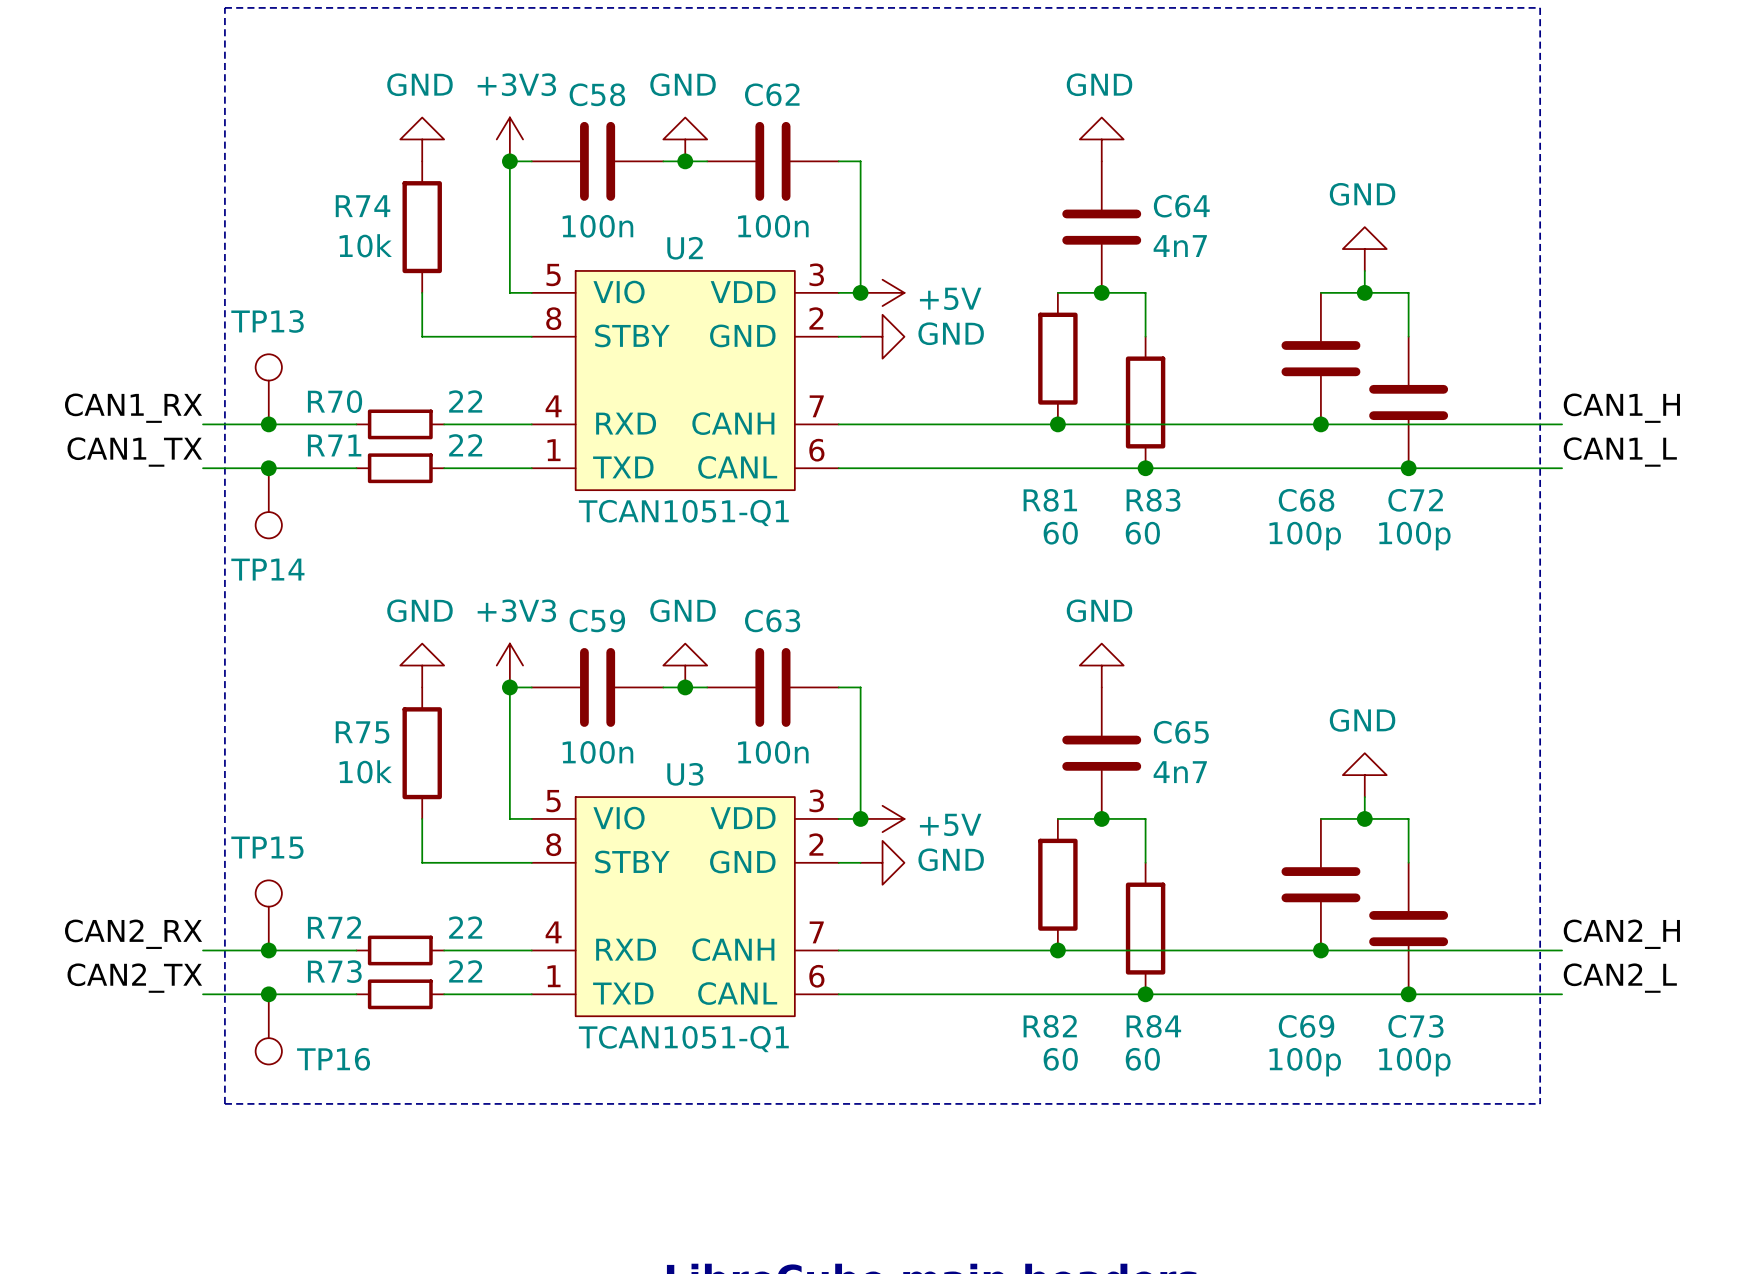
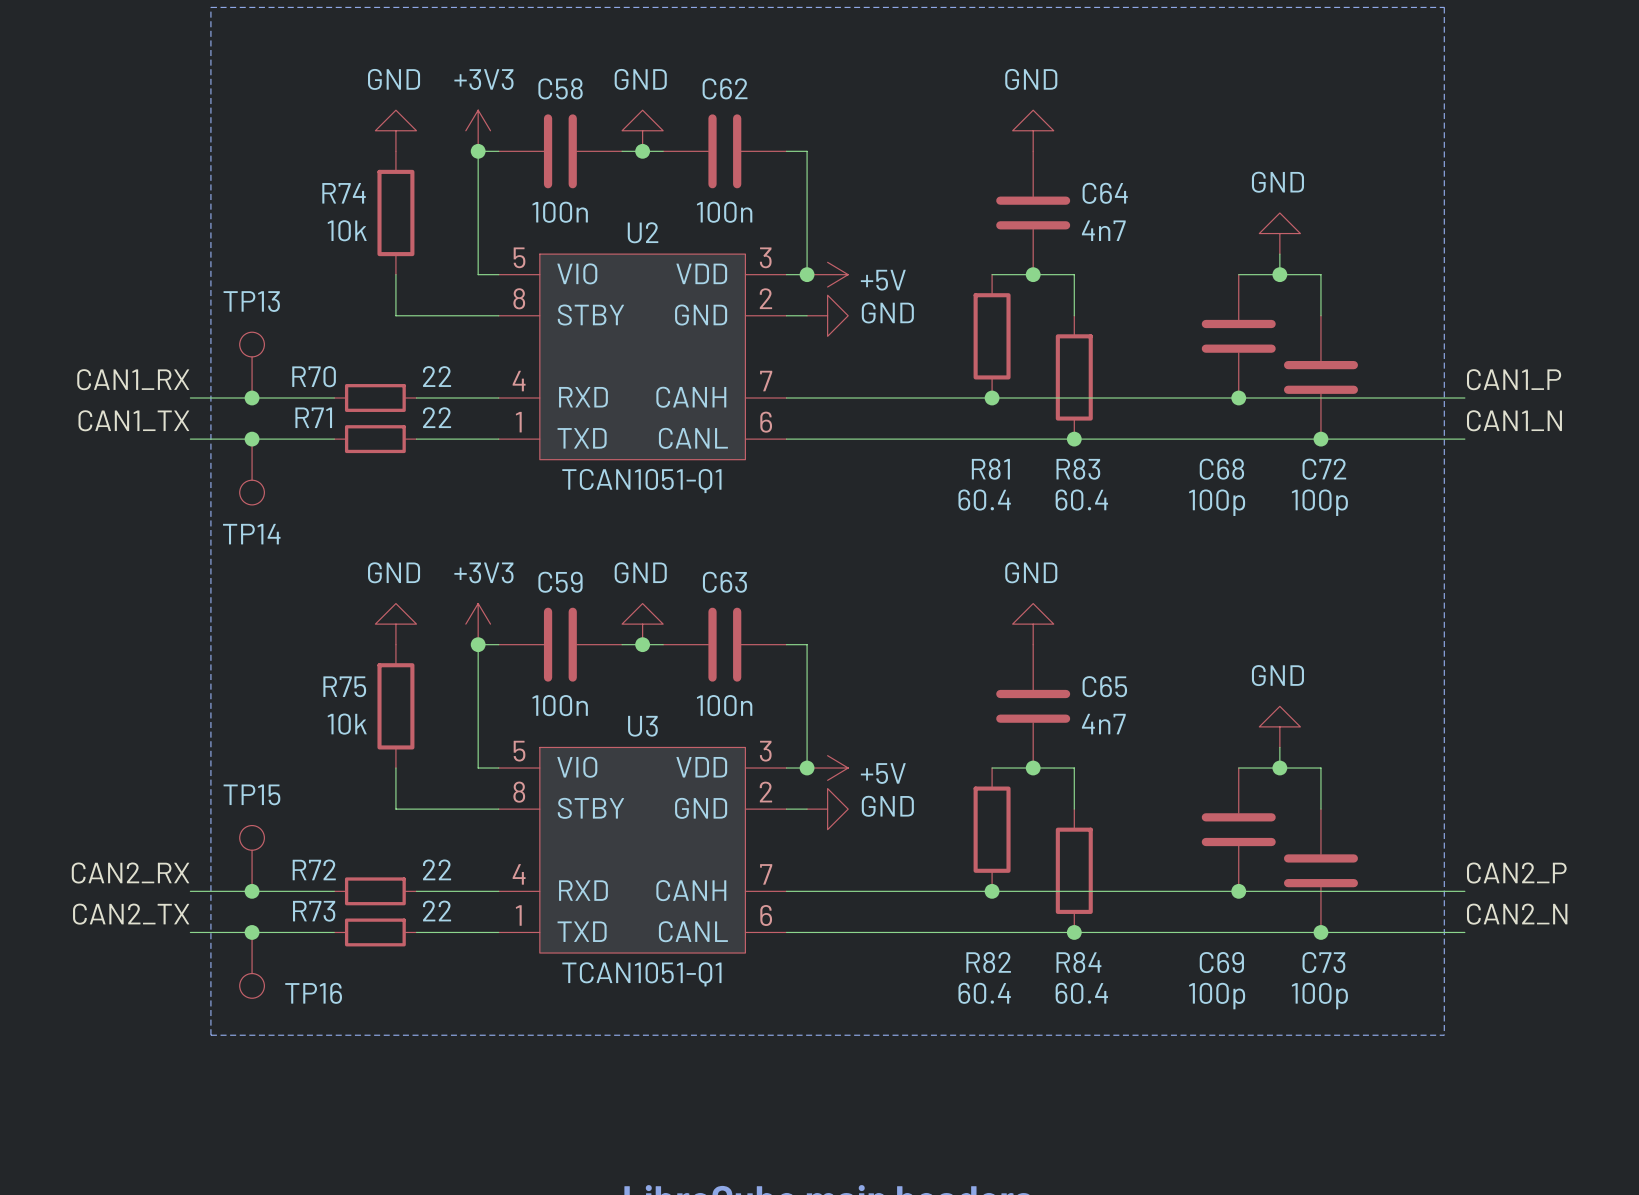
label: CAN1_H (1621, 408) -> CAN1_P (1514, 379)
label: CAN1_L (1620, 452) -> CAN1_N (1514, 420)
R81 value: 60 (1060, 533) -> 60.4 (984, 500)
R83 value: 60 (1142, 533) -> 60.4 (1081, 500)
label: CAN2_H (1621, 934) -> CAN2_P (1516, 873)
label: CAN2_L (1620, 978) -> CAN2_N (1517, 914)
R82 value: 60 (1060, 1059) -> 60.4 (984, 993)
R84 value: 60 (1142, 1059) -> 60.4 (1081, 993)

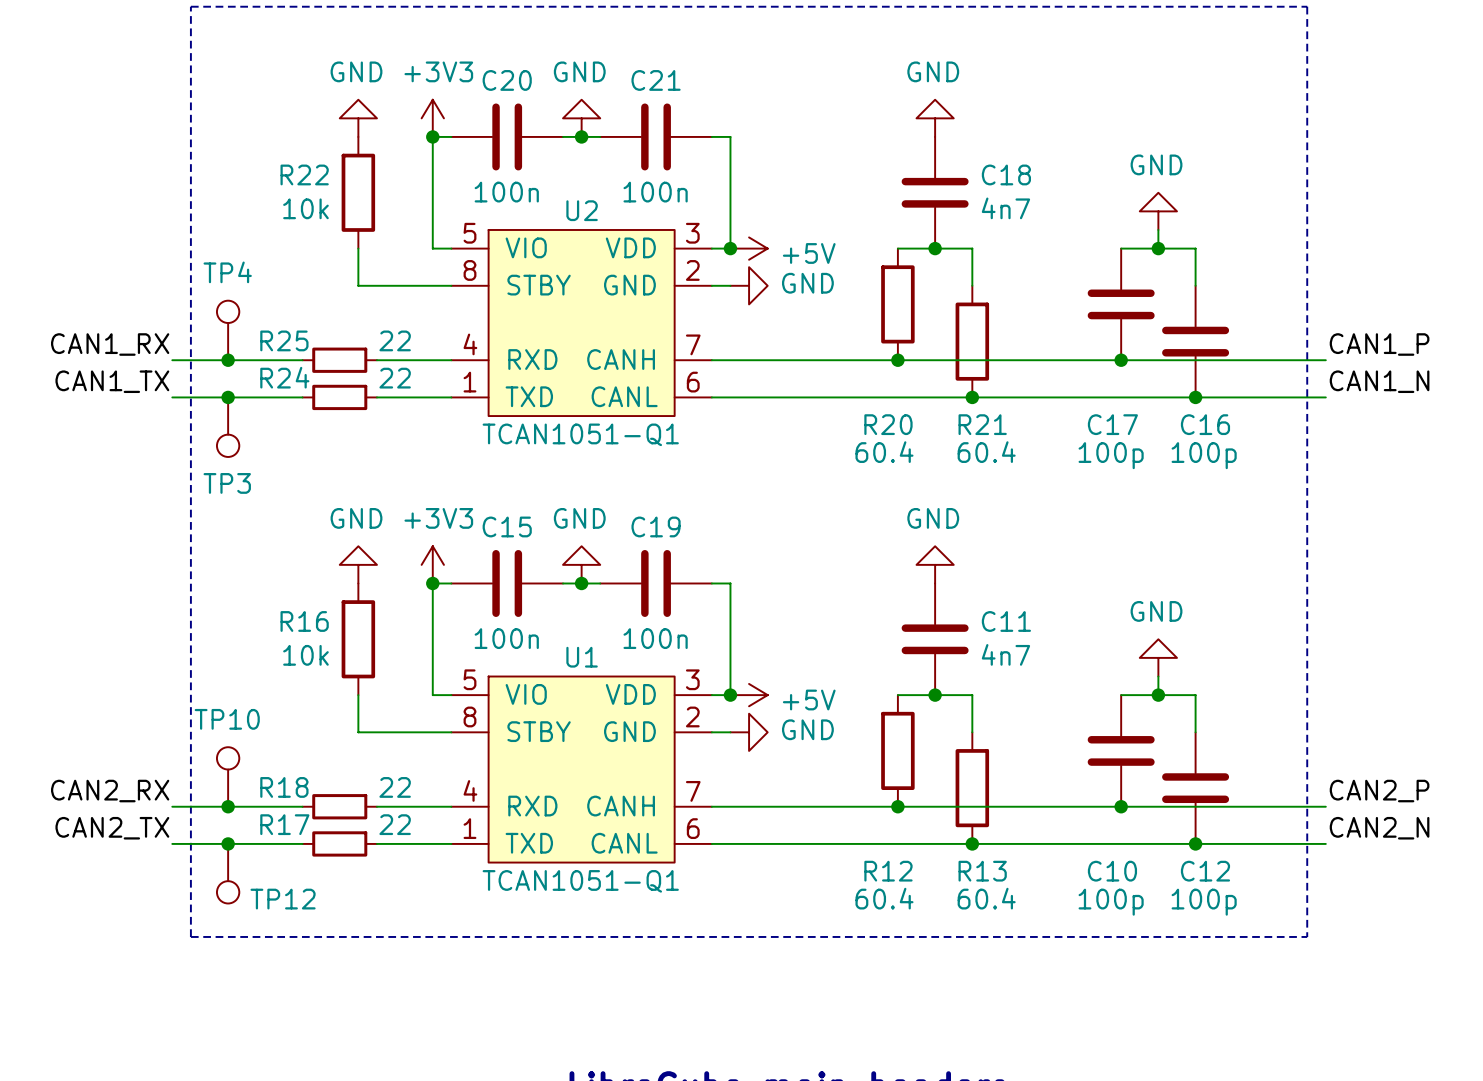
C58 name: C58 (560, 88) -> C20 (507, 80)
C62 name: C62 (725, 88) -> C21 (656, 80)
R74 name: R74 (344, 193) -> R22 (304, 174)
C64 name: C64 (1105, 193) -> C18 (1006, 174)
TP13 name: TP13 (251, 301) -> TP4 (227, 272)
R70 name: R70 (314, 376) -> R25 (284, 340)
R71 name: R71 (313, 417) -> R24 (284, 377)
R81 name: R81 (990, 469) -> R20 (888, 424)
R83 name: R83 (1078, 469) -> R21 (982, 424)
C68 name: C68 (1221, 469) -> C17 (1112, 424)
C72 name: C72 (1324, 469) -> C16 (1205, 424)
TP14 name: TP14 (251, 534) -> TP3 (227, 483)
C59 name: C59 (560, 582) -> C15 (507, 526)
C63 name: C63 (724, 582) -> C19 (656, 526)
R75 name: R75 (344, 686) -> R16 (304, 621)
C65 name: C65 (1104, 686) -> C11 (1006, 621)
U3 name: U3 (642, 726) -> U1 (582, 657)
TP15 name: TP15 (251, 794) -> TP10 (227, 719)
R72 name: R72 (314, 869) -> R18 (284, 787)
R73 name: R73 (314, 911) -> R17 (284, 824)
R82 name: R82 (988, 962) -> R12 (888, 871)
R84 name: R84 (1078, 962) -> R13 (982, 871)
C69 name: C69 (1221, 962) -> C10 (1112, 871)
C73 name: C73 (1323, 962) -> C12 (1205, 871)
TP16 name: TP16 (313, 993) -> TP12 (283, 899)

